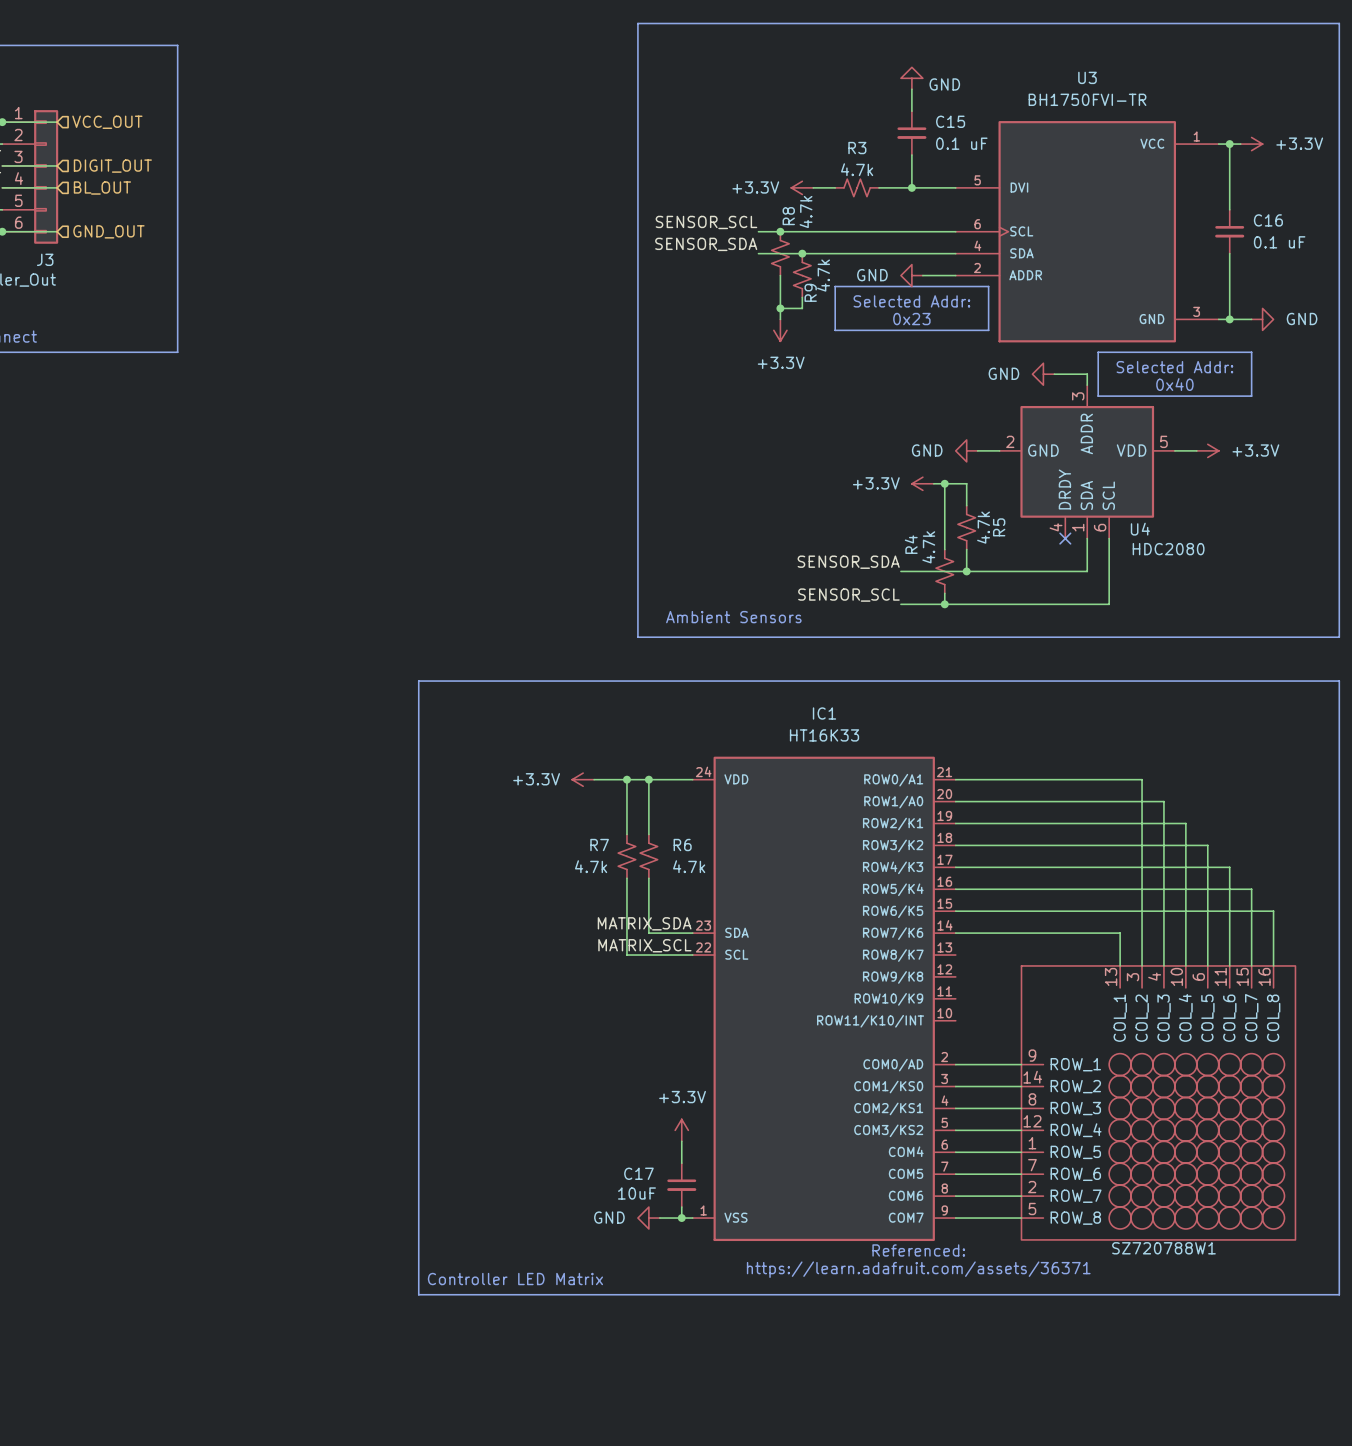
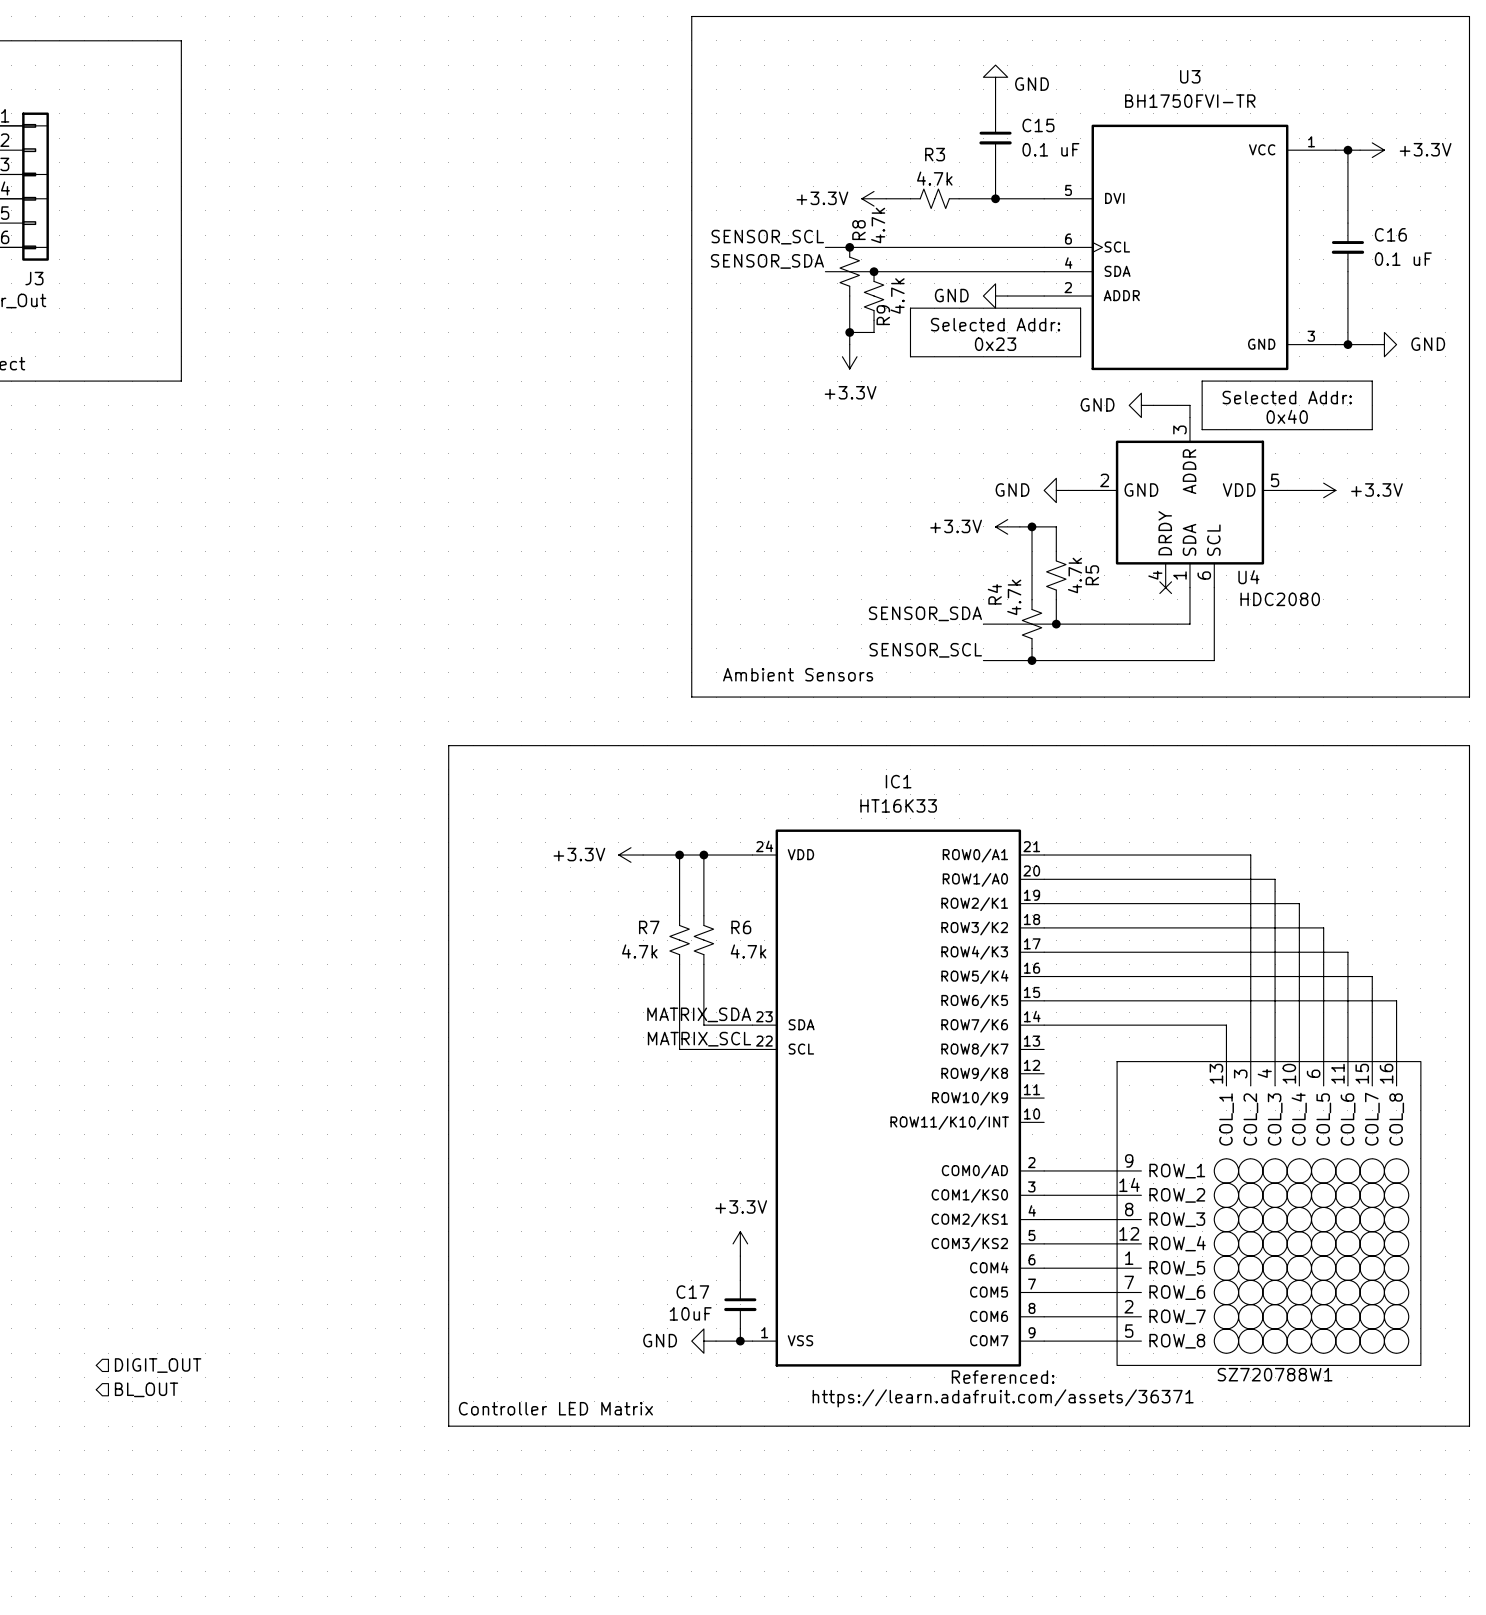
hierarchical label: VCC_OUT (107, 122) -> none
hierarchical label: DIGIT_OUT (112, 166) -> none
hierarchical label: BL_OUT (102, 188) -> none
hierarchical label: GND_OUT (108, 231) -> none
hierarchical label: none -> DIGIT_OUT (158, 1365)
hierarchical label: none -> BL_OUT (146, 1389)

